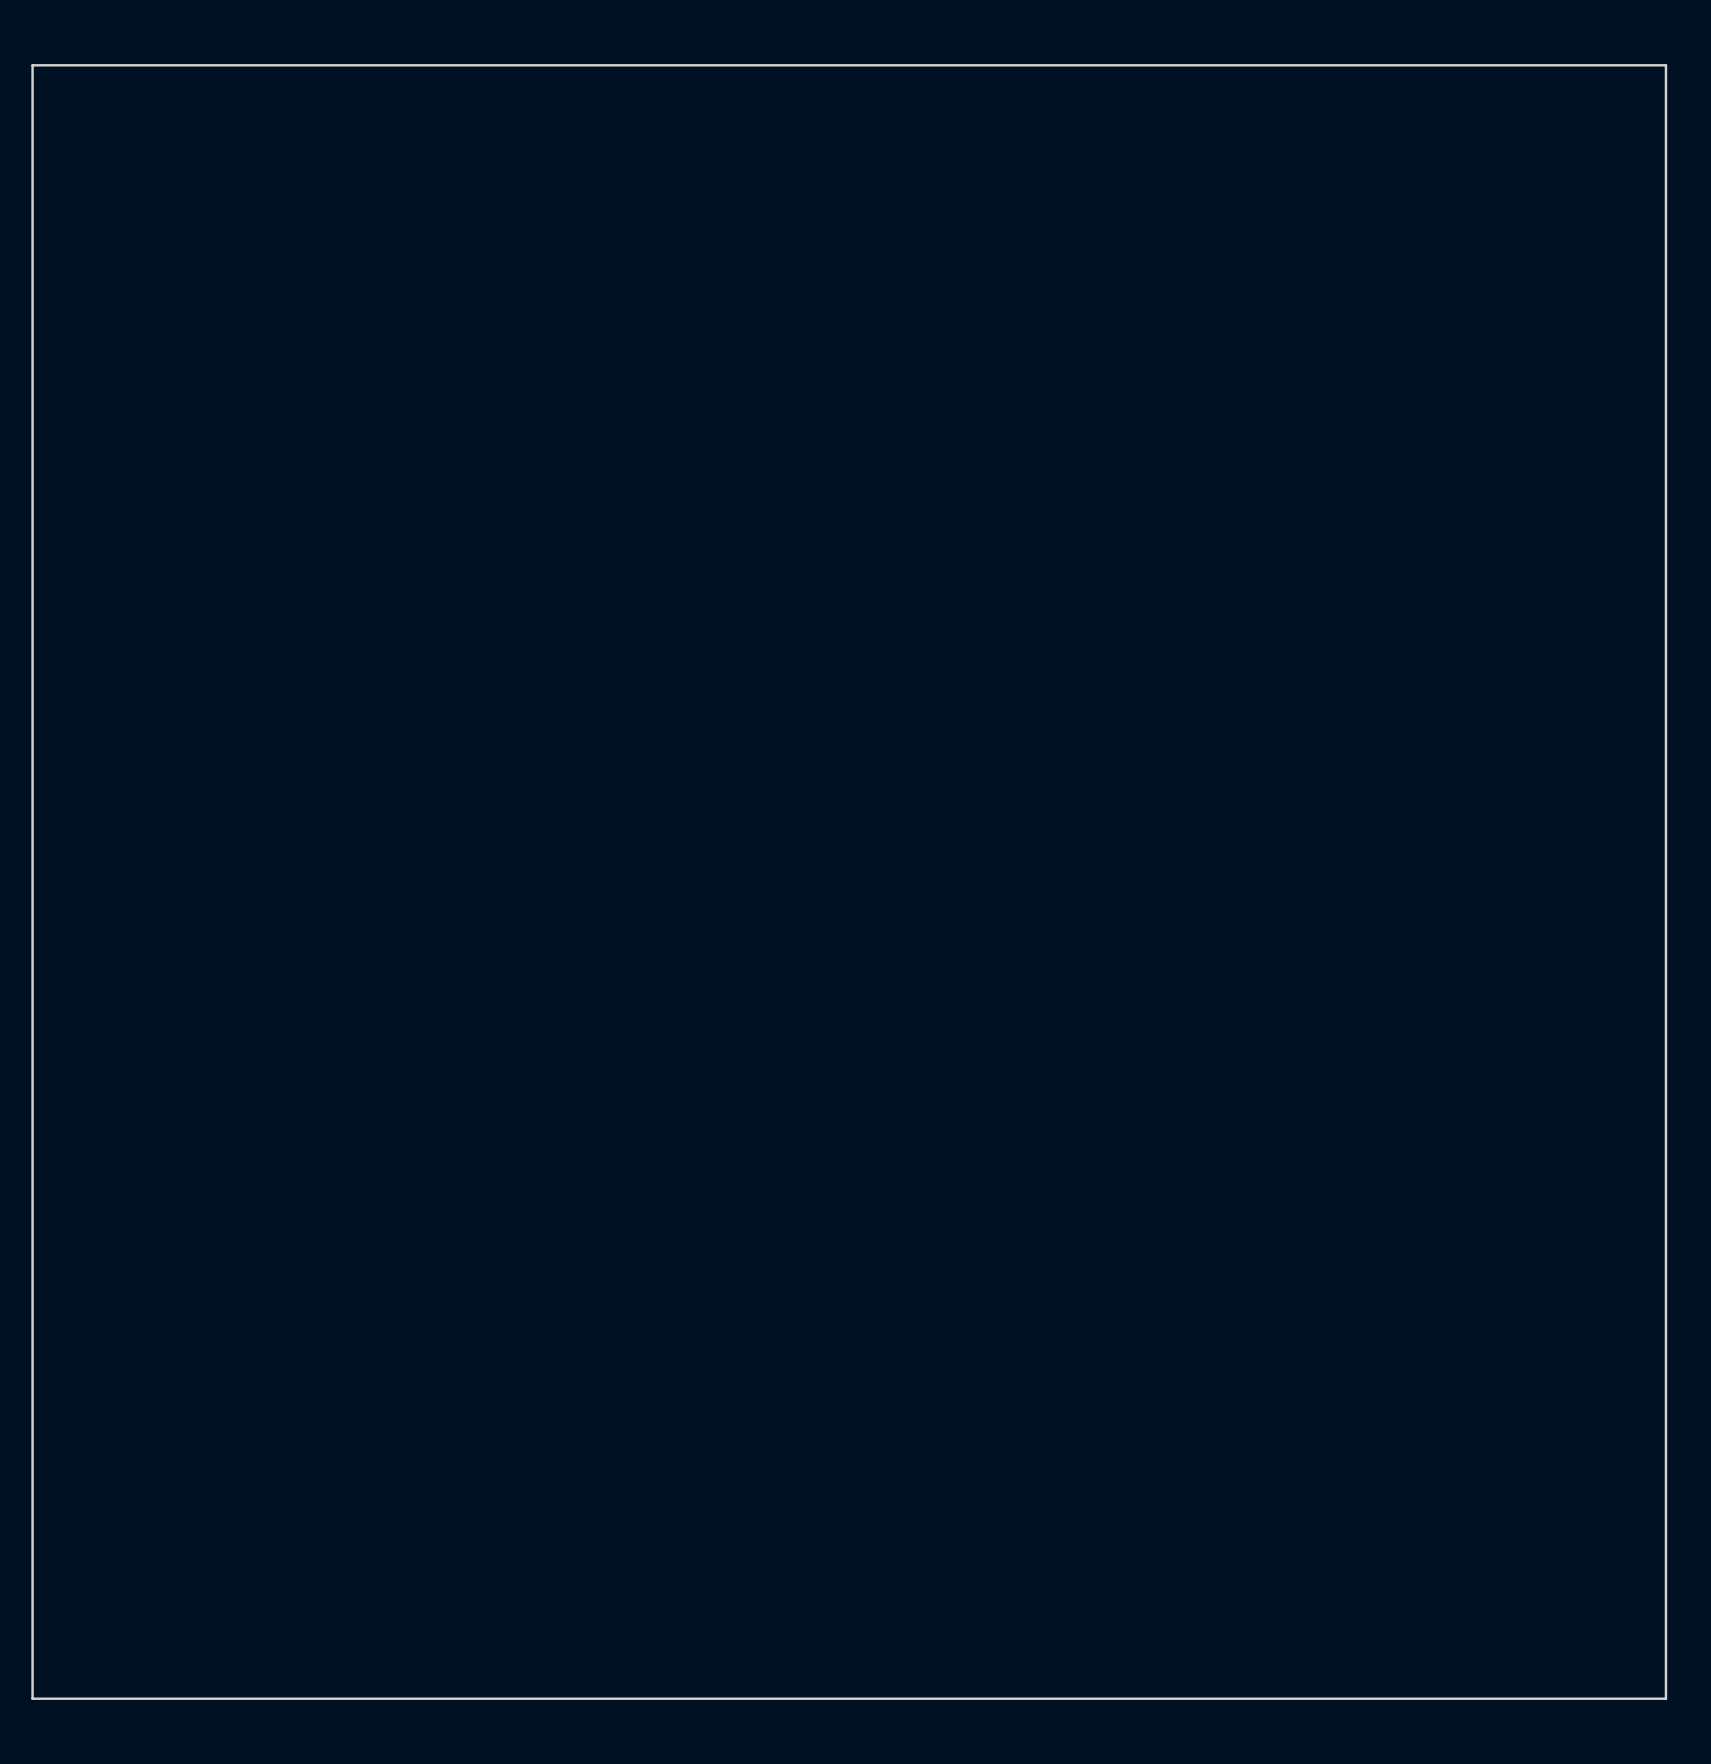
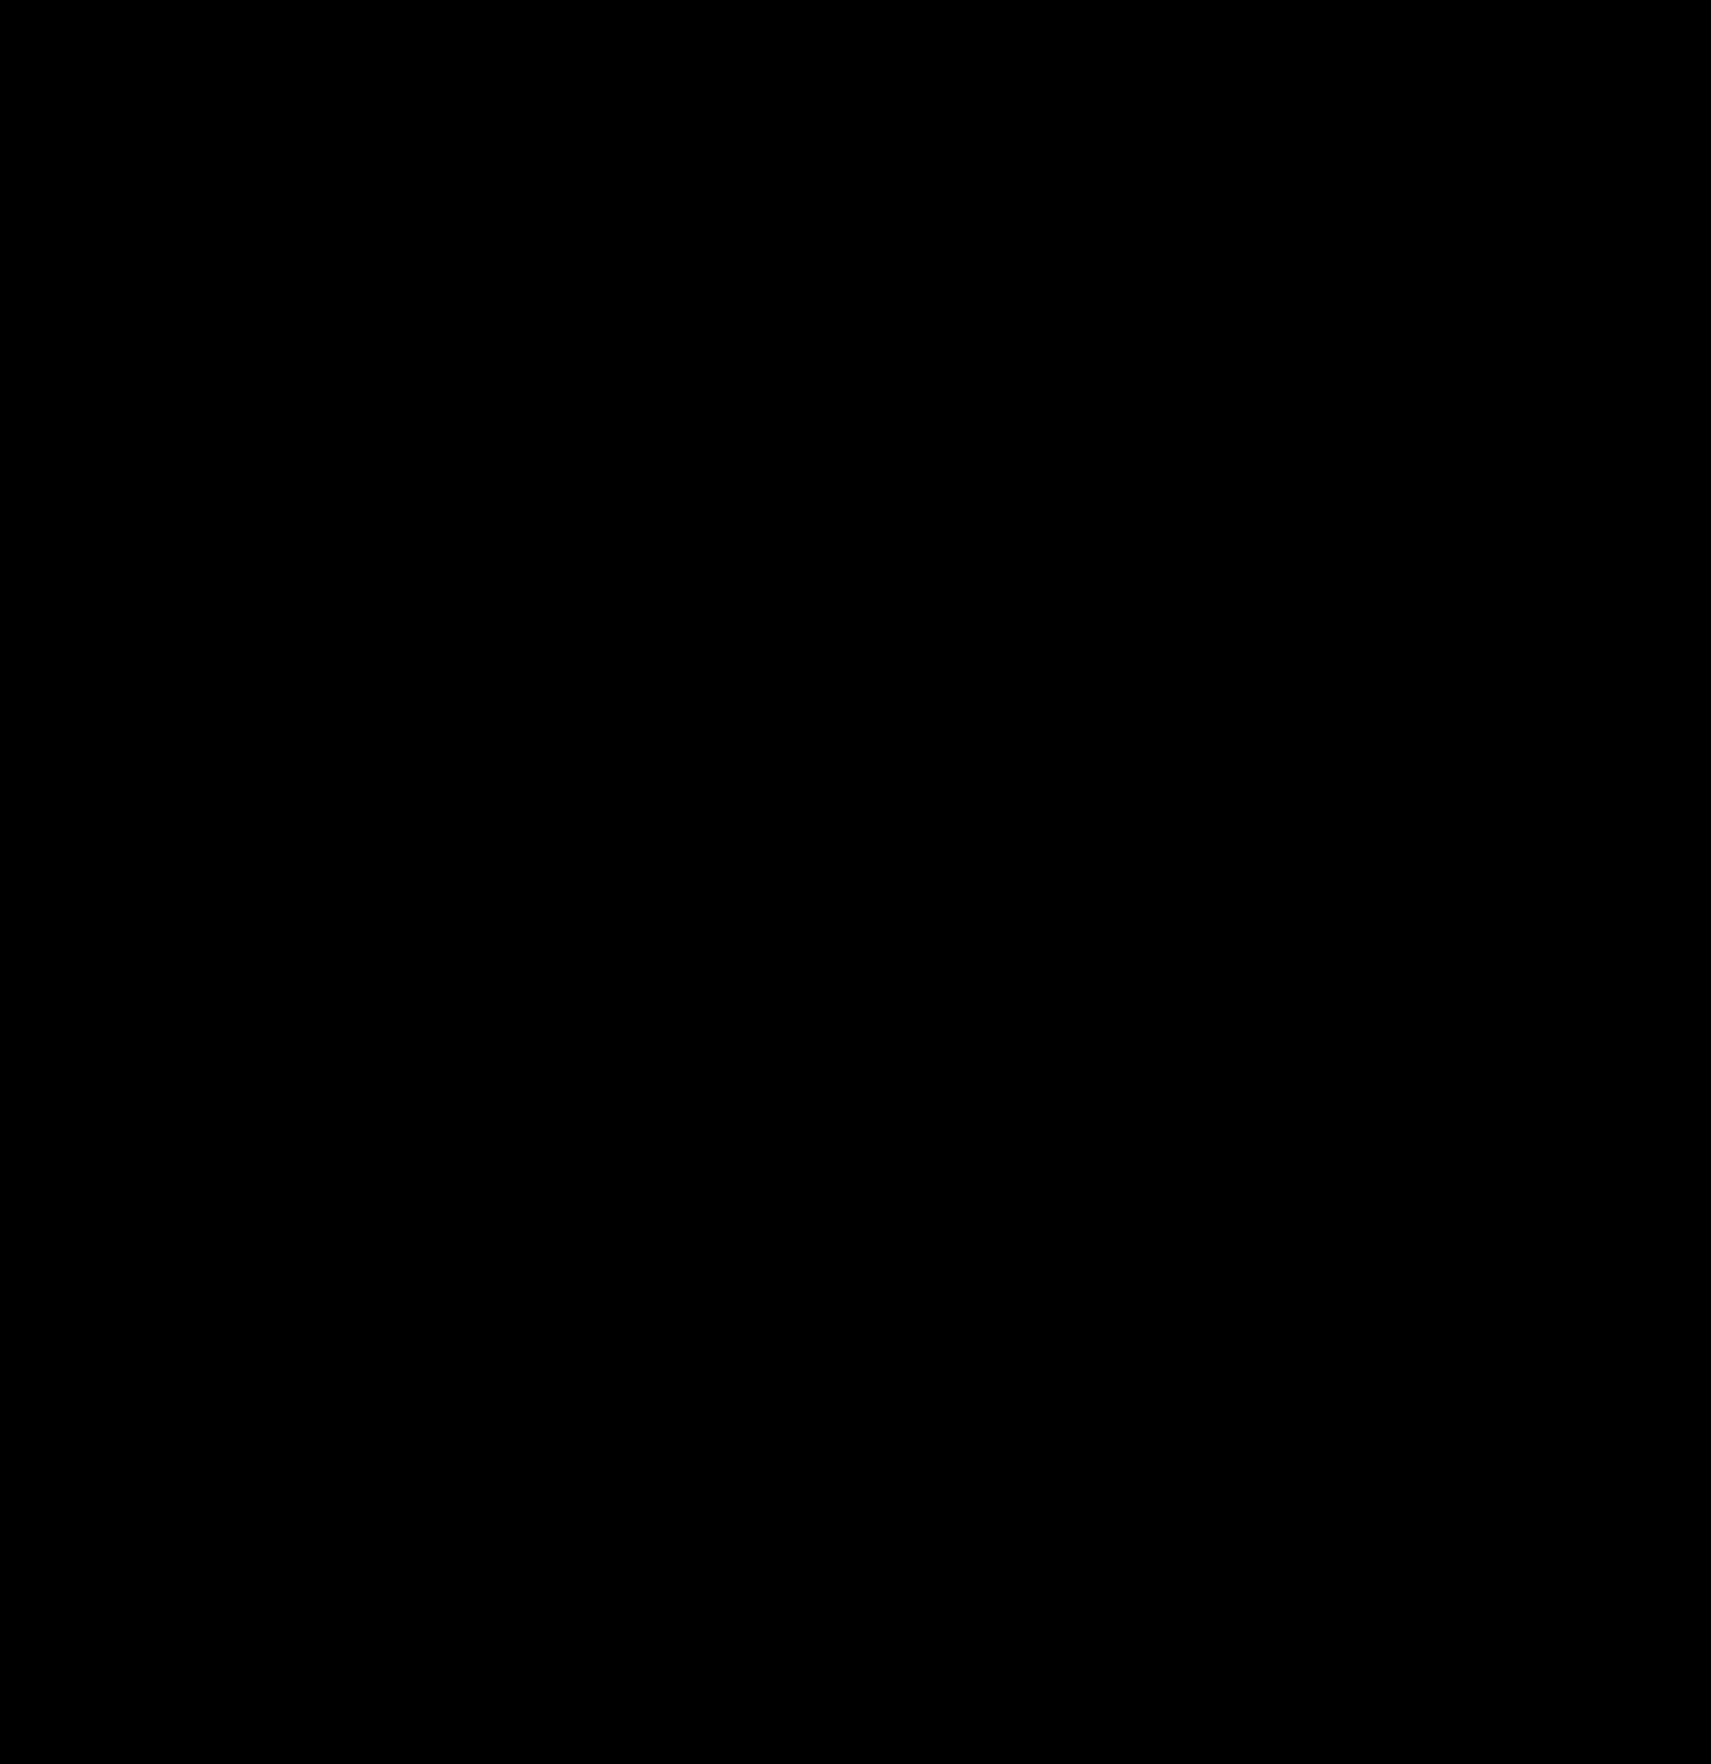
board edge: (32, 65) (1665, 65) (1665, 1698) (32, 1698) (32, 65) -> none

